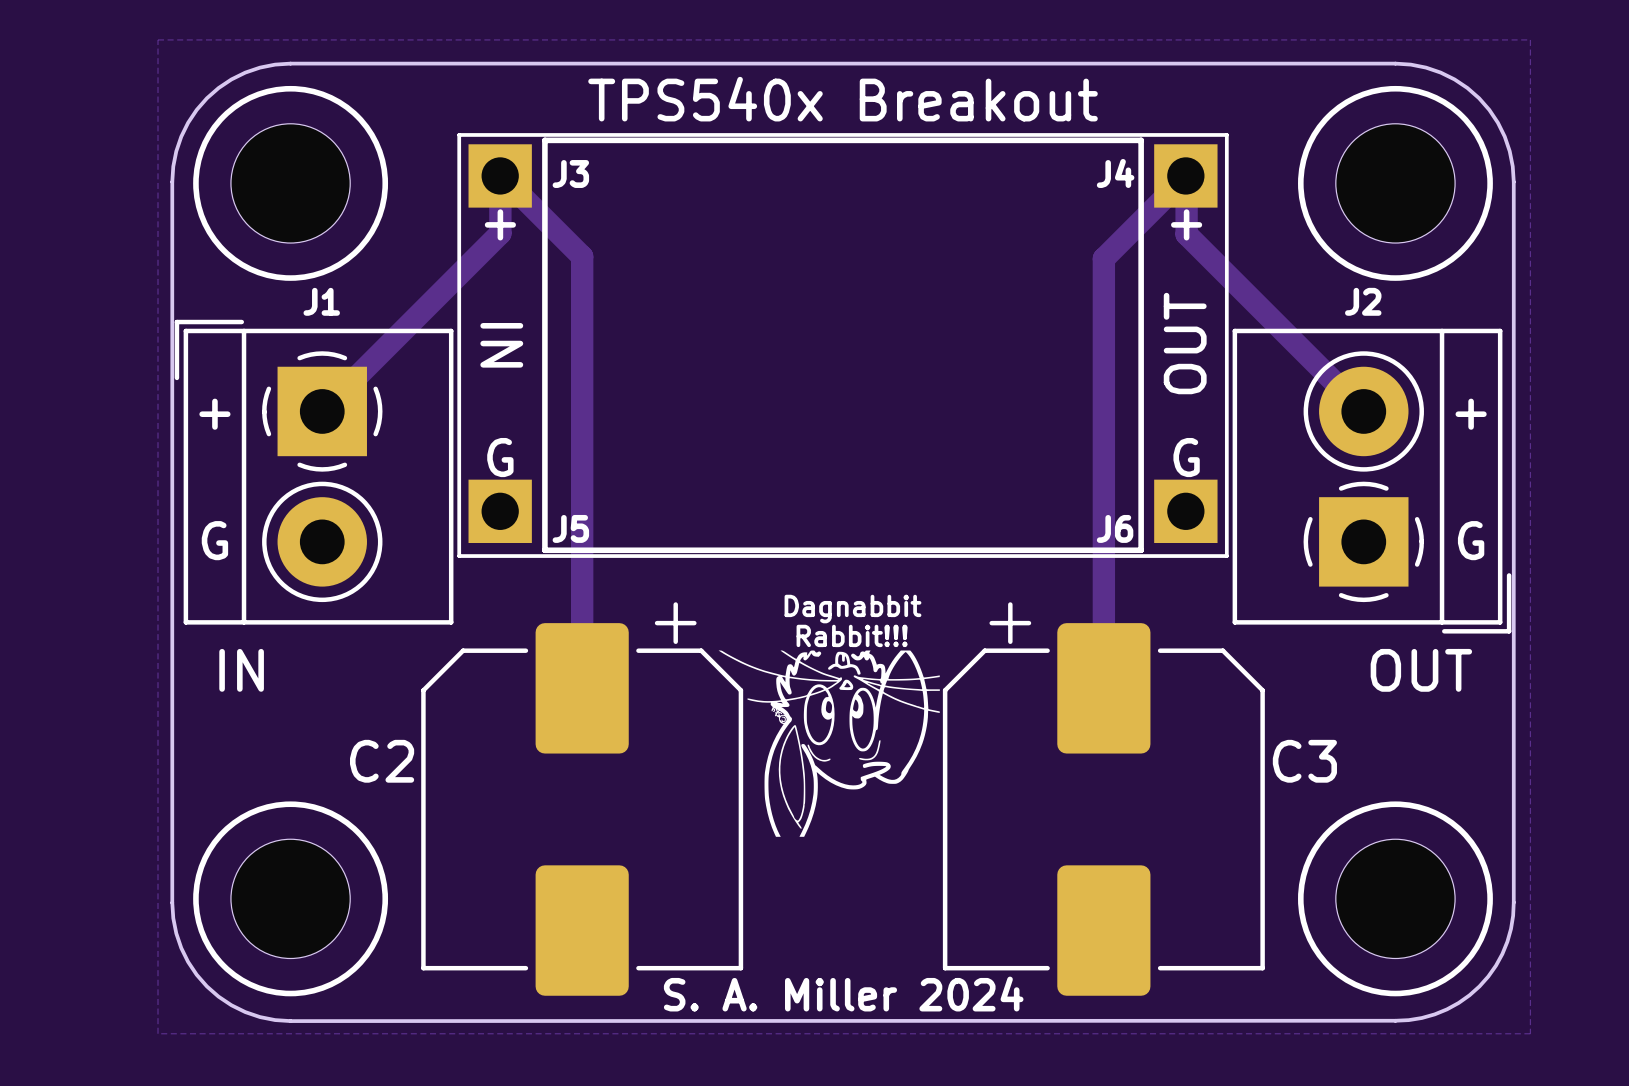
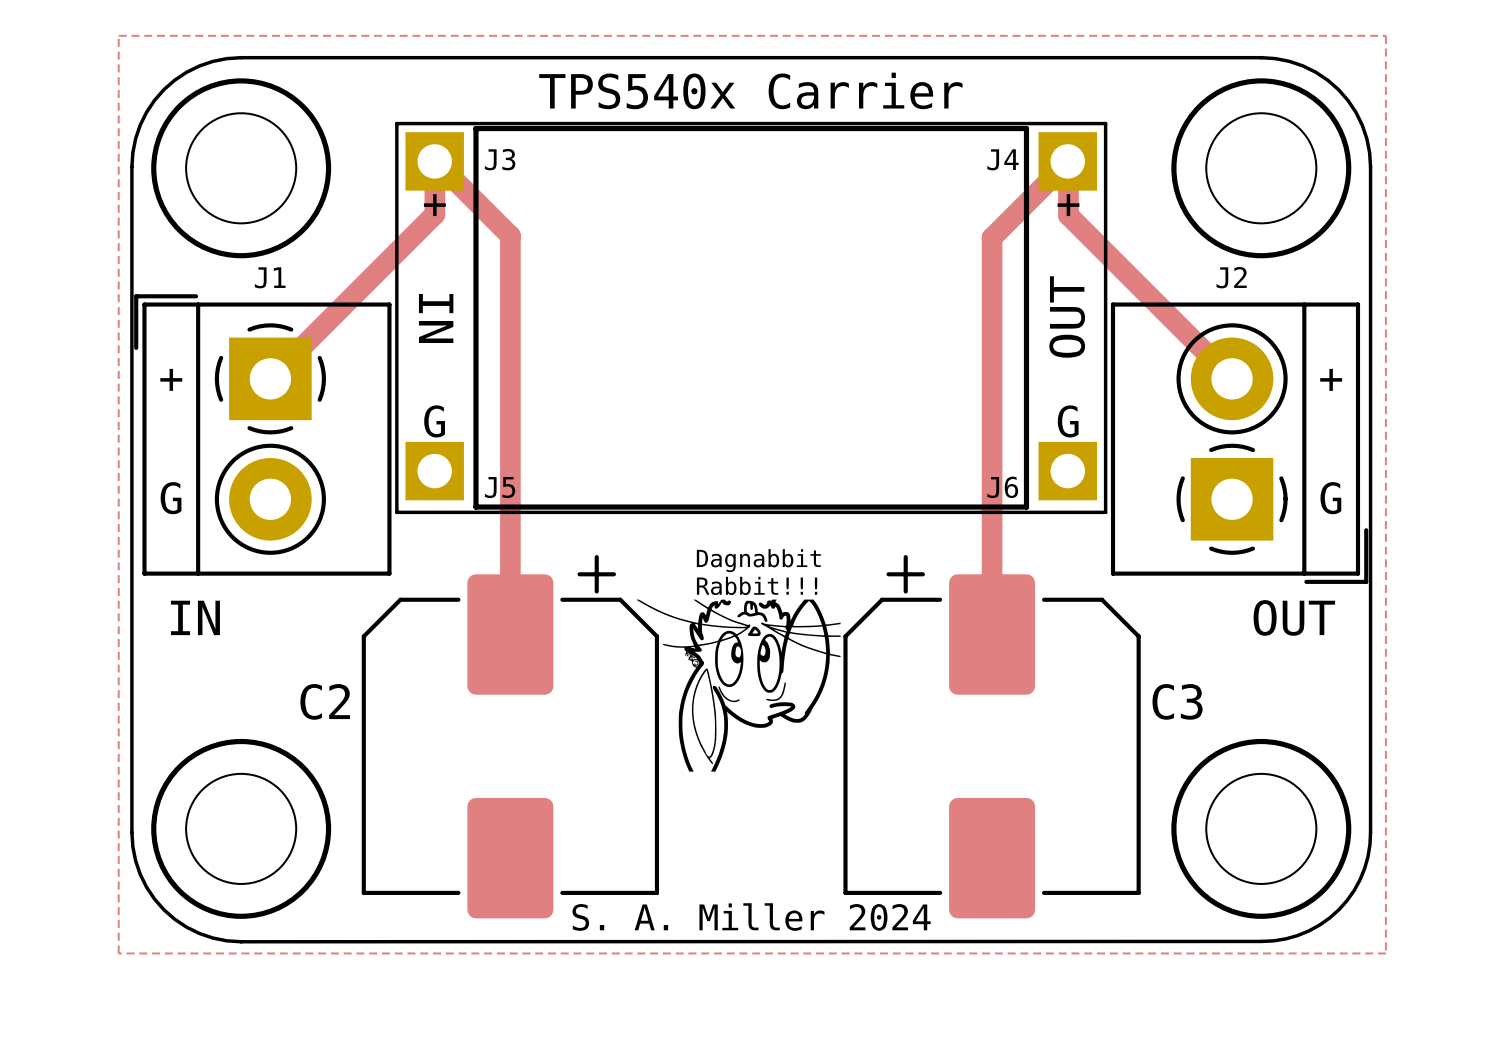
text: TPS540x Breakout (843, 99) -> TPS540x Carrier (750, 90)

